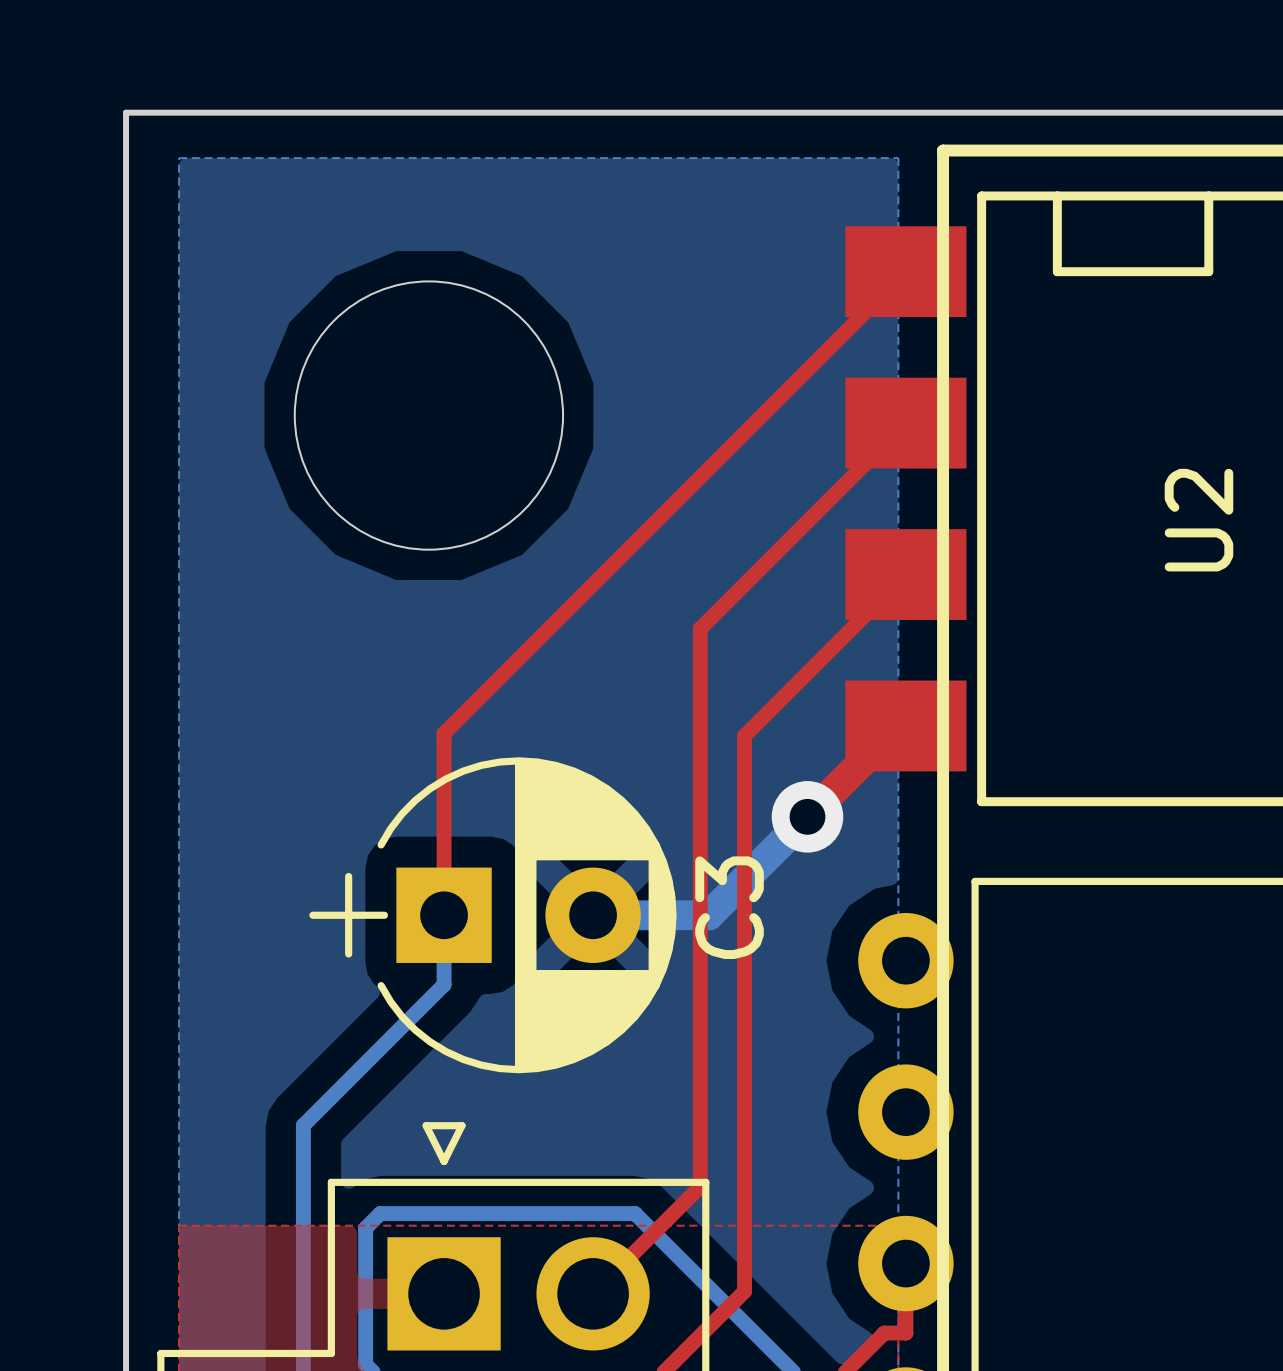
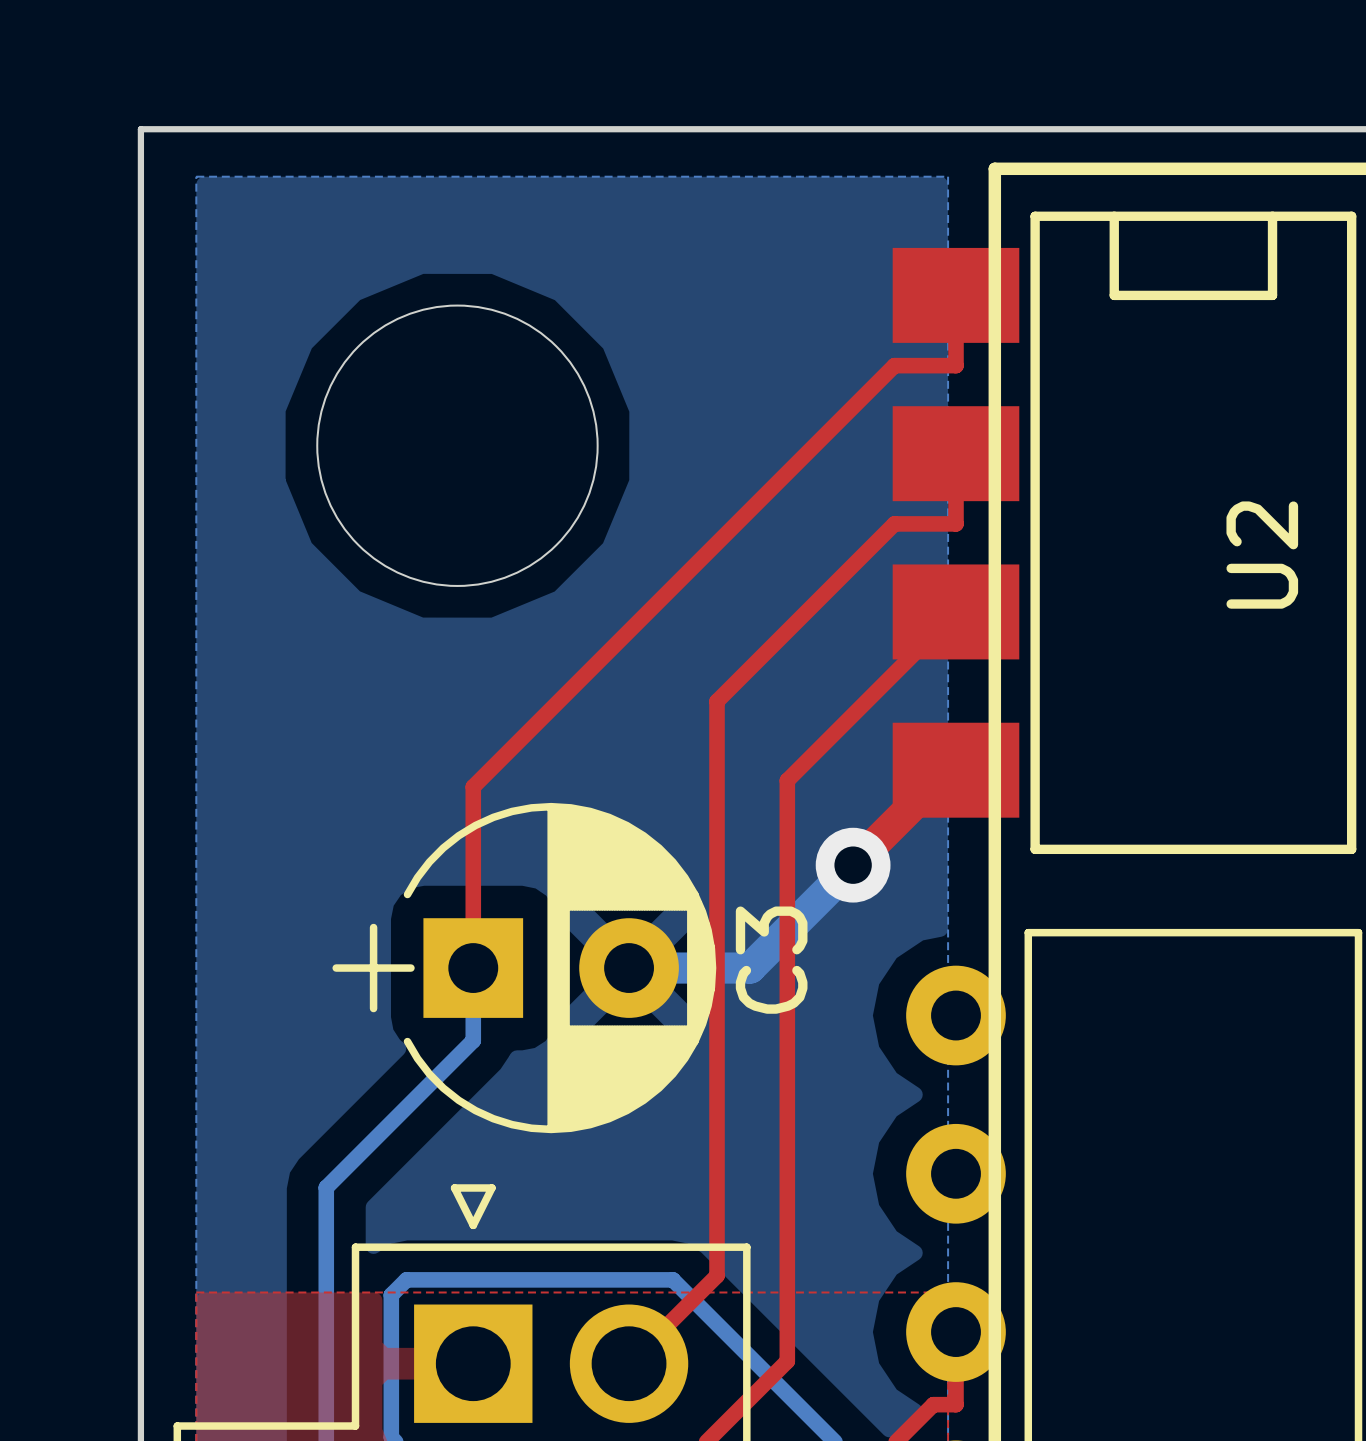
top track: (905, 271) (444, 733) (444, 741) -> (955, 295) (955, 365) (894, 365) (473, 786)
top track: (905, 423) (700, 628) (700, 1186) (677, 1209) -> (955, 453) (955, 523) (894, 523) (717, 701) (717, 1275)

